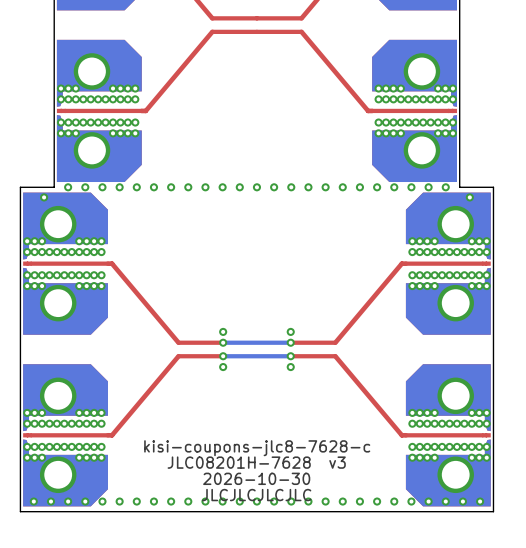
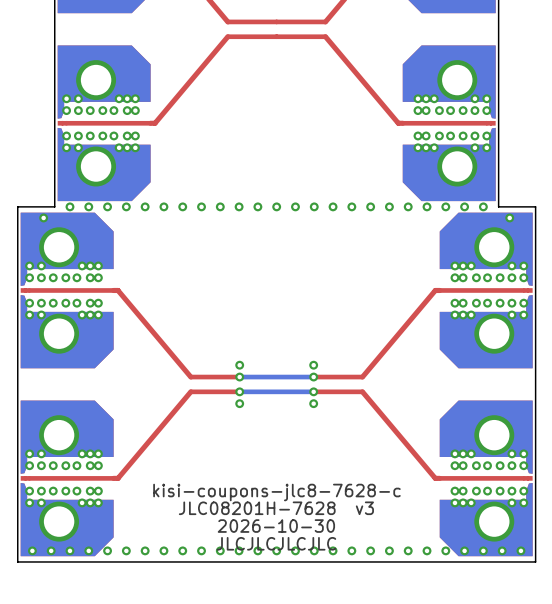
via: (60, 88) -> none
via: none -> (66, 98)
via: (68, 88) -> none
via: (135, 88) -> none
via: (378, 88) -> none
via: (445, 88) -> none
via: none -> (486, 98)
via: (452, 88) -> none
via: (60, 99) -> none
via: none -> (66, 110)
via: (68, 99) -> none
via: (83, 99) -> none
via: none -> (90, 110)
via: (90, 99) -> none
via: (105, 99) -> none
via: none -> (113, 110)
via: (113, 99) -> none
via: (135, 99) -> none
via: (378, 99) -> none
via: (400, 99) -> none
via: none -> (439, 110)
via: (408, 99) -> none
via: (423, 99) -> none
via: none -> (463, 110)
via: (430, 99) -> none
via: (445, 99) -> none
via: none -> (486, 110)
via: (452, 99) -> none
via: (60, 122) -> none
via: none -> (66, 135)
via: (68, 122) -> none
via: (83, 122) -> none
via: none -> (90, 135)
via: (90, 122) -> none
via: (105, 122) -> none
via: none -> (113, 135)
via: (113, 122) -> none
via: (135, 122) -> none
via: (378, 122) -> none
via: (400, 122) -> none
via: none -> (439, 135)
via: (408, 122) -> none
via: (423, 122) -> none
via: none -> (463, 135)
via: (430, 122) -> none
via: (445, 122) -> none
via: none -> (486, 135)
via: (452, 122) -> none
via: (60, 133) -> none
via: none -> (66, 147)
via: (68, 133) -> none
via: (135, 133) -> none
via: (378, 133) -> none
via: (445, 133) -> none
via: none -> (486, 147)
via: (452, 133) -> none
via: (27, 241) -> none
via: none -> (29, 265)
via: (34, 241) -> none
via: (101, 241) -> none
via: (412, 241) -> none
via: (479, 241) -> none
via: none -> (523, 265)
via: (486, 241) -> none
via: (27, 252) -> none
via: none -> (29, 277)
via: (34, 252) -> none
via: (49, 252) -> none
via: none -> (53, 277)
via: (56, 252) -> none
via: (71, 252) -> none
via: none -> (76, 277)
via: (79, 252) -> none
via: (101, 252) -> none
via: (412, 252) -> none
via: (434, 252) -> none
via: none -> (476, 277)
via: (442, 252) -> none
via: (456, 252) -> none
via: none -> (500, 277)
via: (464, 252) -> none
via: (479, 252) -> none
via: none -> (523, 277)
via: (486, 252) -> none
via: (27, 275) -> none
via: none -> (29, 303)
via: (34, 275) -> none
via: (49, 275) -> none
via: none -> (53, 303)
via: (56, 275) -> none
via: (71, 275) -> none
via: none -> (76, 303)
via: (79, 275) -> none
via: (101, 275) -> none
via: (412, 275) -> none
via: (434, 275) -> none
via: none -> (476, 303)
via: (442, 275) -> none
via: (456, 275) -> none
via: none -> (500, 303)
via: (464, 275) -> none
via: (479, 275) -> none
via: none -> (523, 303)
via: (486, 275) -> none
via: (27, 286) -> none
via: none -> (29, 315)
via: (34, 286) -> none
via: (101, 286) -> none
via: (412, 286) -> none
via: (479, 286) -> none
via: none -> (523, 315)
via: (486, 286) -> none
via: (27, 412) -> none
via: none -> (29, 453)
via: (34, 412) -> none
via: (101, 412) -> none
via: (412, 412) -> none
via: (479, 412) -> none
via: none -> (523, 453)
via: (486, 412) -> none
via: (27, 423) -> none
via: none -> (29, 465)
via: (34, 423) -> none
via: (49, 423) -> none
via: none -> (53, 465)
via: (56, 423) -> none
via: (71, 423) -> none
via: none -> (76, 465)
via: (79, 423) -> none
via: (101, 423) -> none
via: (412, 423) -> none
via: (434, 423) -> none
via: none -> (476, 465)
via: (442, 423) -> none
via: (456, 423) -> none
via: none -> (500, 465)
via: (464, 423) -> none
via: (479, 423) -> none
via: none -> (523, 465)
via: (486, 423) -> none
via: (27, 446) -> none
via: none -> (29, 491)
via: (34, 446) -> none
via: (49, 446) -> none
via: none -> (53, 491)
via: (56, 446) -> none
via: (71, 446) -> none
via: none -> (76, 491)
via: (79, 446) -> none
via: (101, 446) -> none
via: (412, 446) -> none
via: (434, 446) -> none
via: none -> (476, 491)
via: (442, 446) -> none
via: (456, 446) -> none
via: none -> (500, 491)
via: (464, 446) -> none
via: (479, 446) -> none
via: none -> (523, 491)
via: (486, 446) -> none
via: (27, 457) -> none
via: none -> (29, 502)
via: (34, 457) -> none
via: (101, 457) -> none
via: (412, 457) -> none
via: (479, 457) -> none
via: none -> (523, 502)
via: (486, 457) -> none

